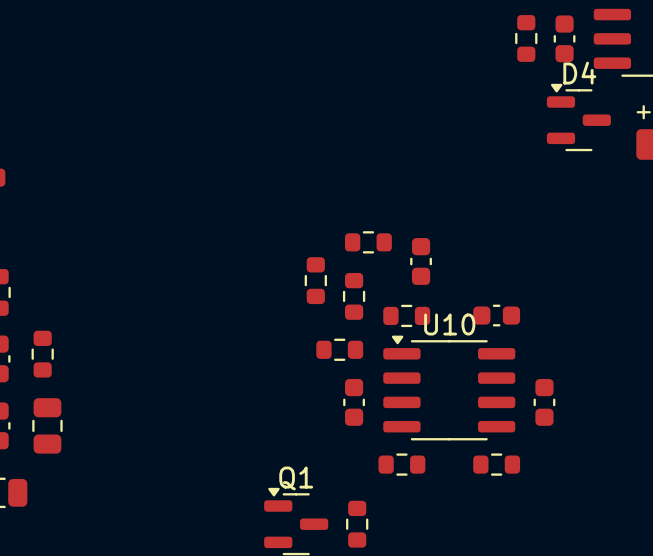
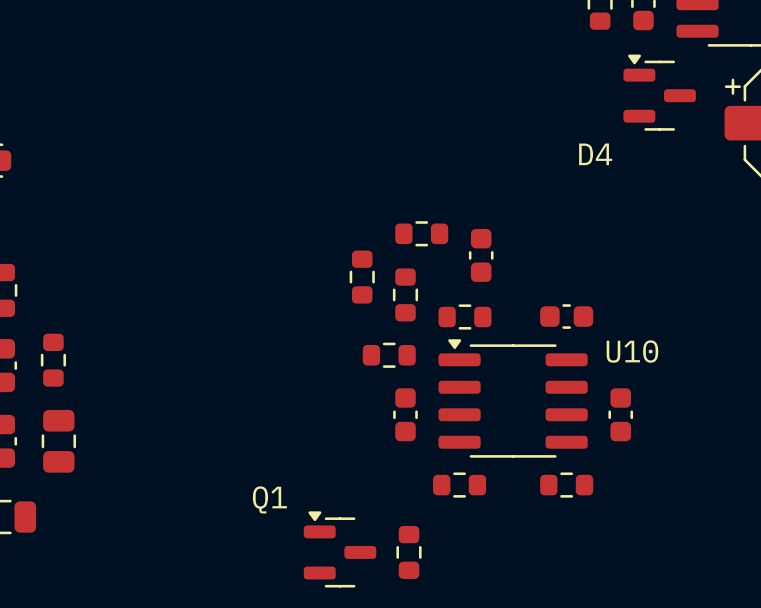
D4 name position: D4 (579, 73) -> D4 (595, 154)
U10 name position: U10 (449, 324) -> U10 (632, 351)
Q1 name position: Q1 (296, 478) -> Q1 (269, 499)

